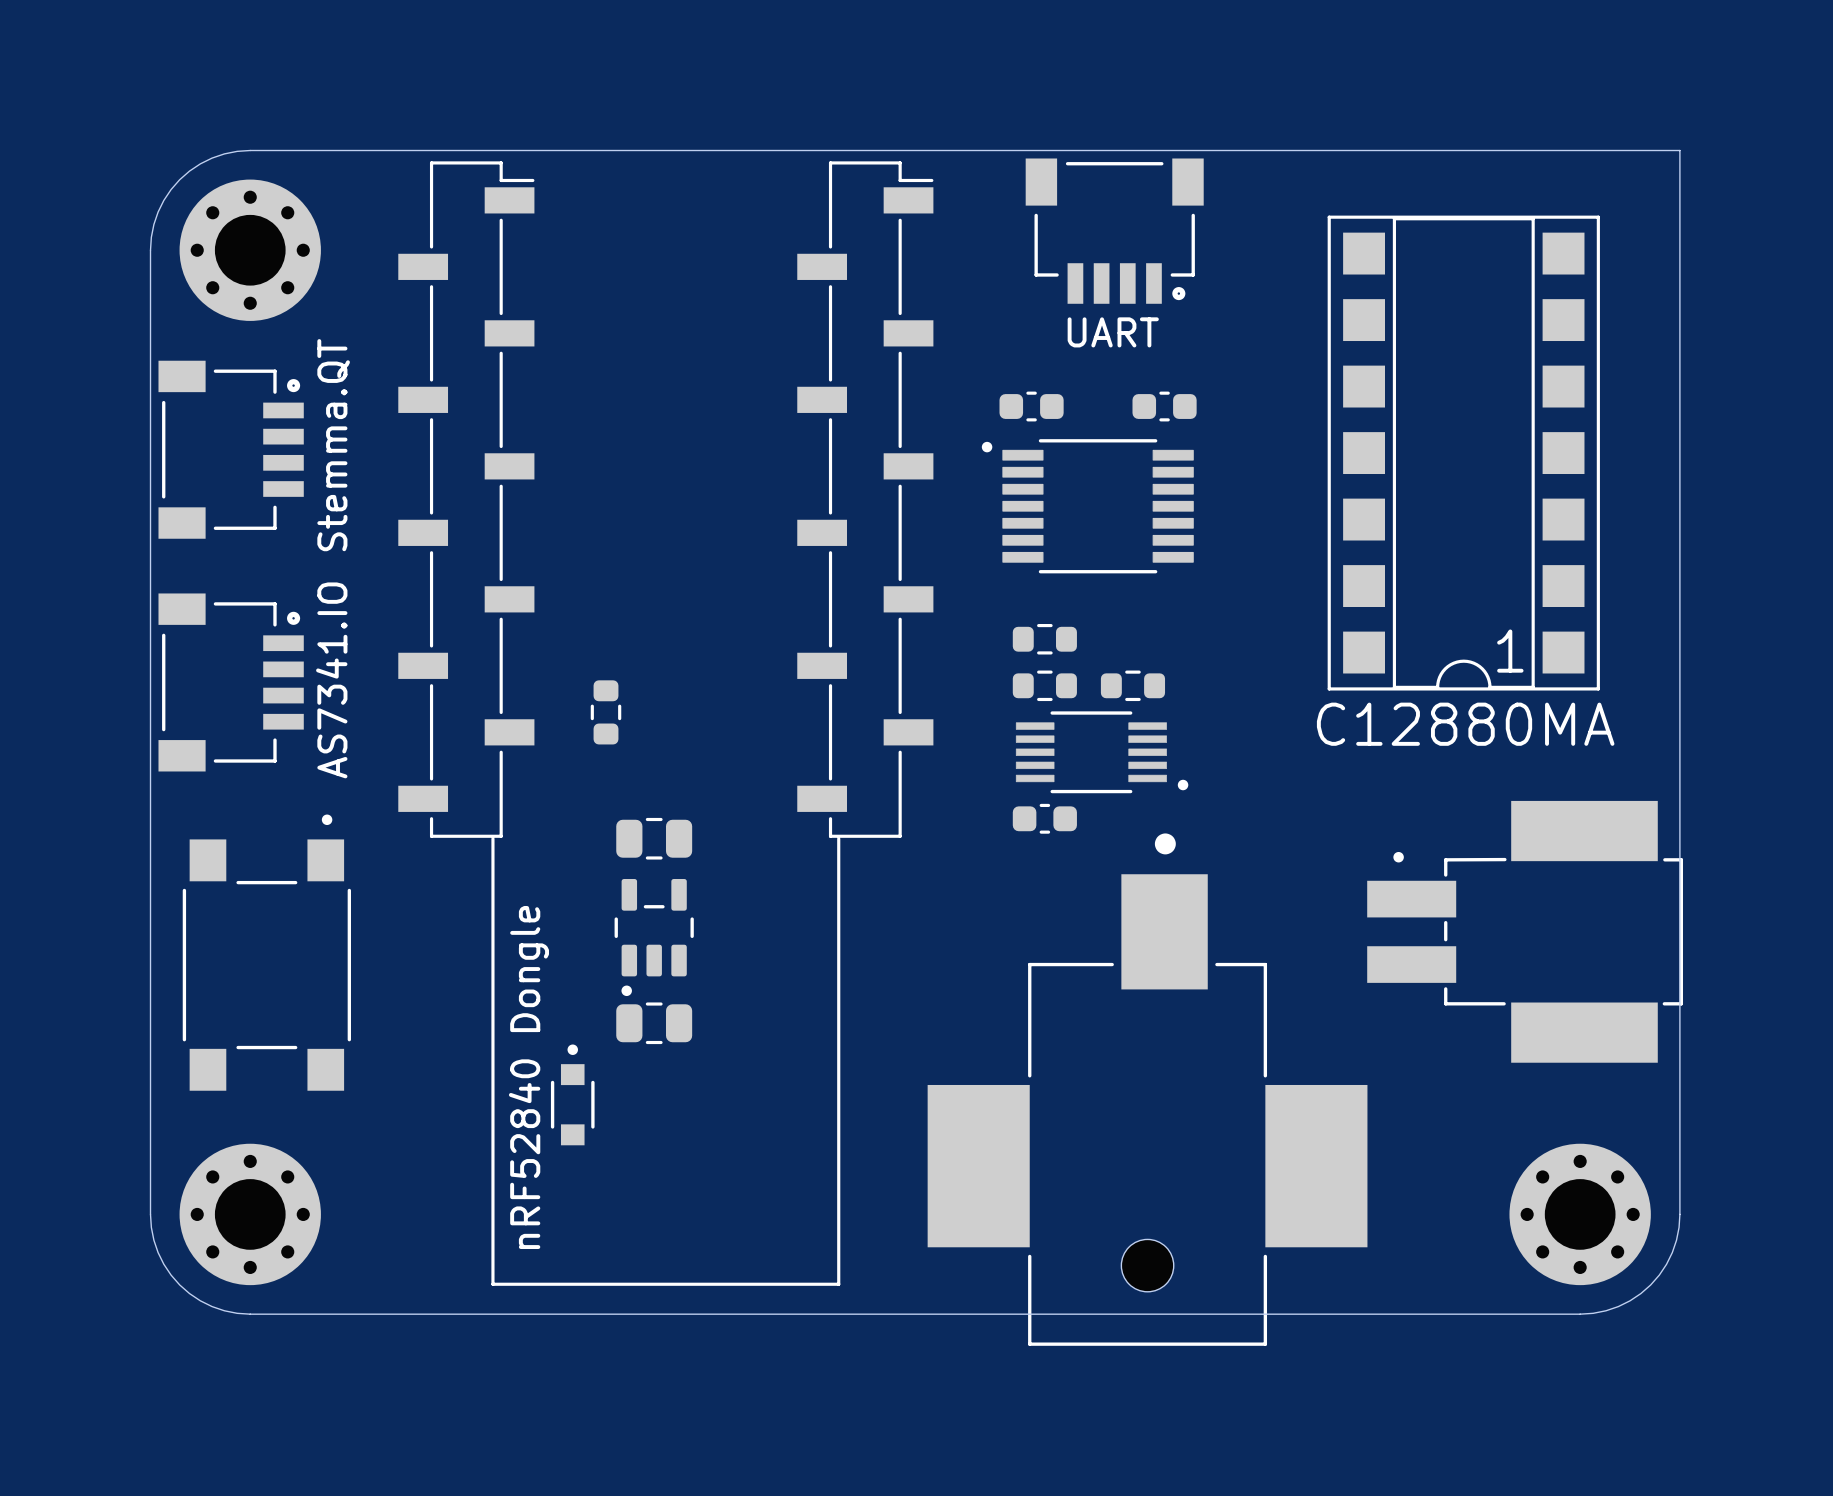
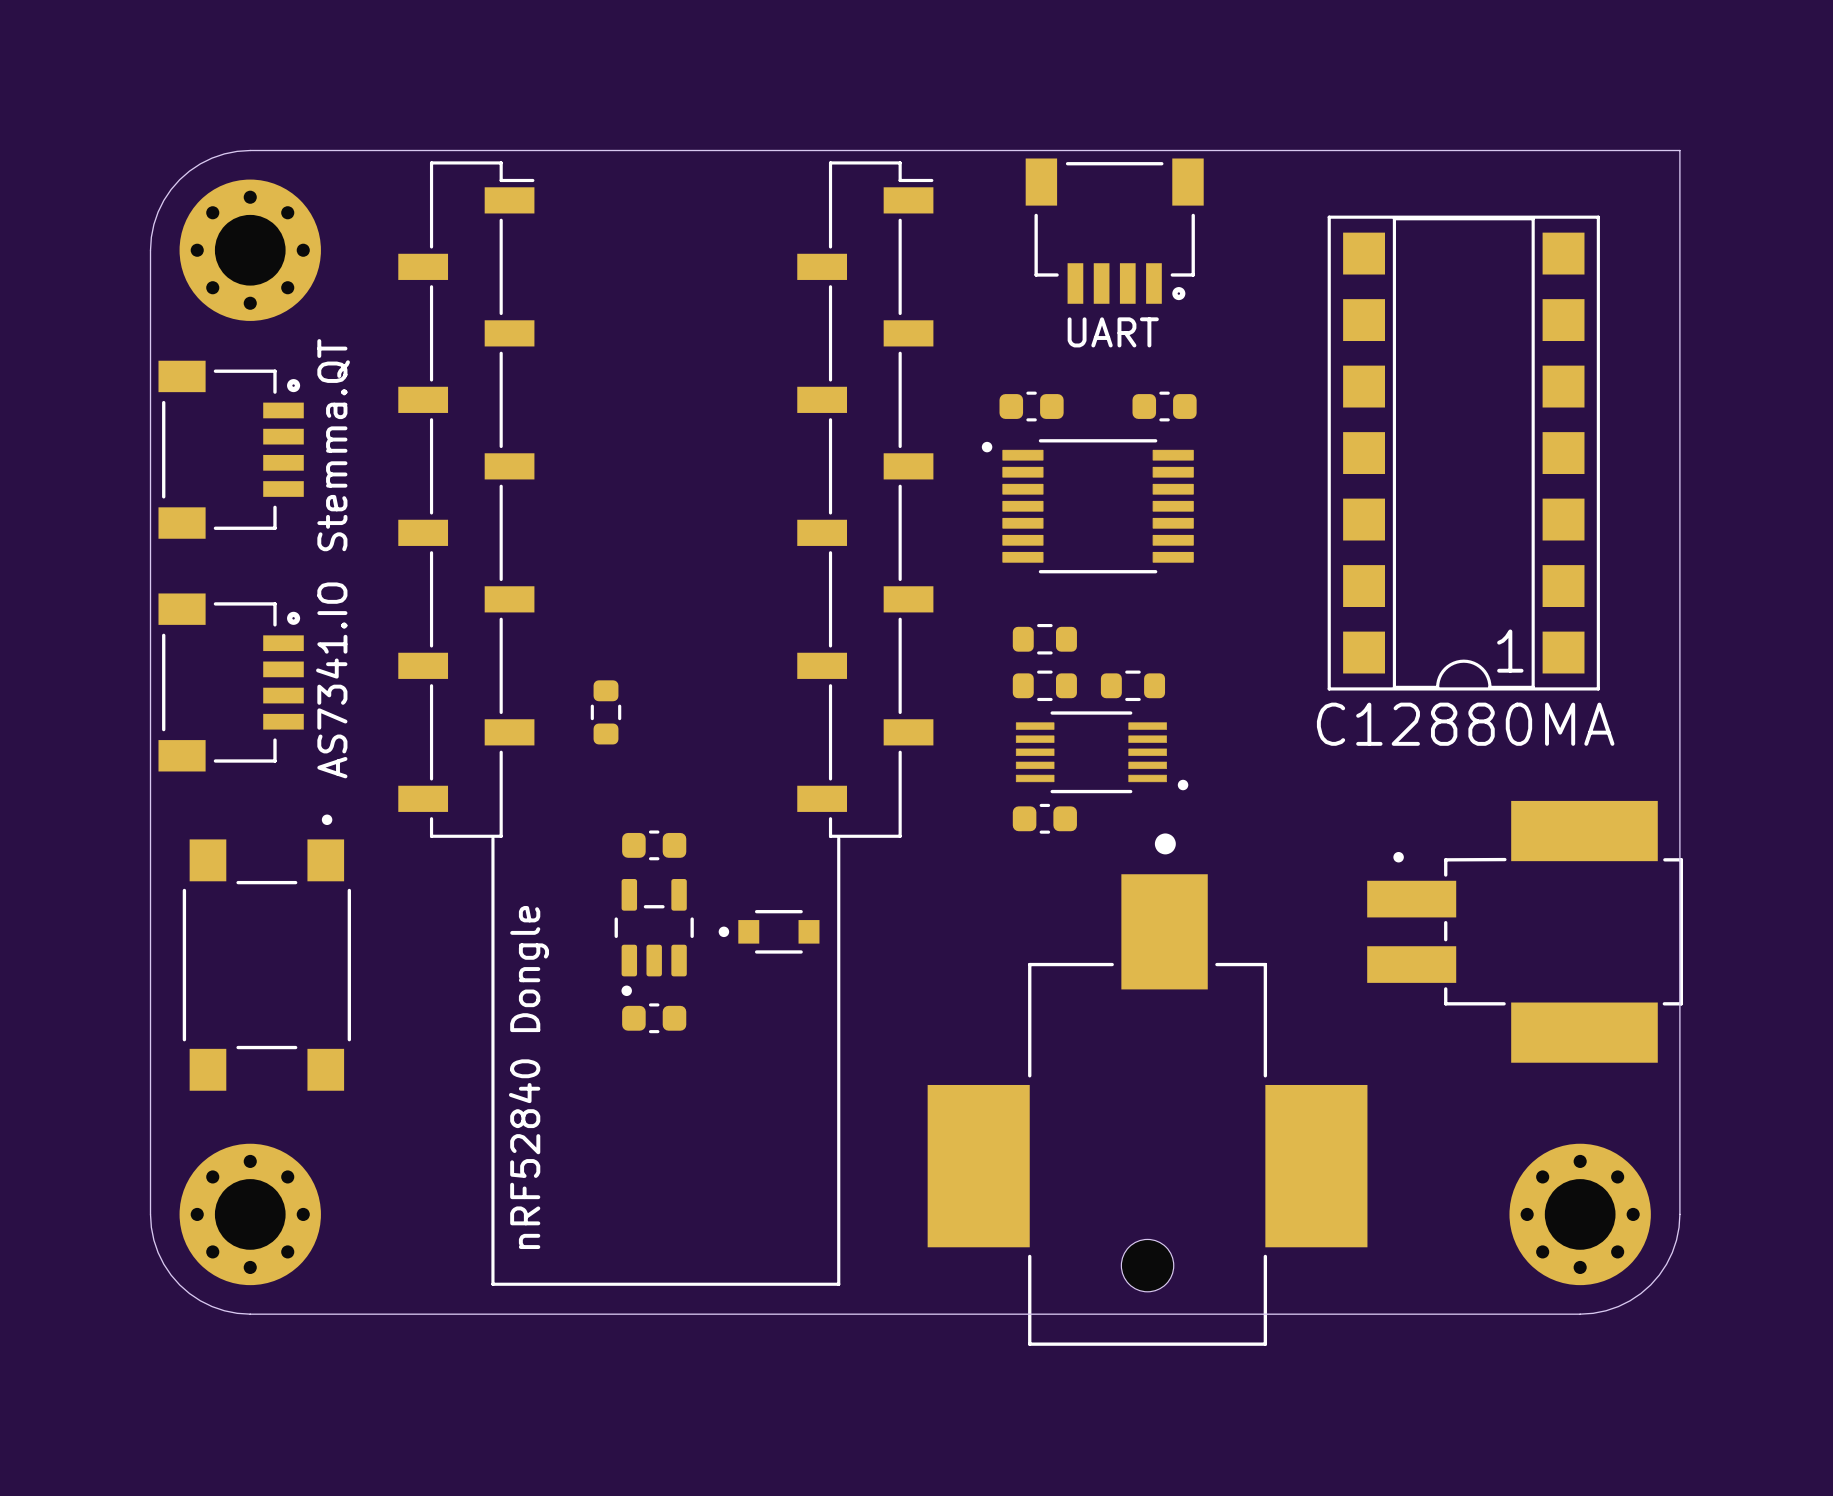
part footprint: [616, 817, 693, 860] -> [622, 830, 687, 861]
part footprint: [616, 1002, 693, 1045] -> [622, 1003, 687, 1034]
part rotation: 0° (572, 1094) -> 90° counterclockwise (769, 931)
part position: (572, 1094) -> (769, 931)

